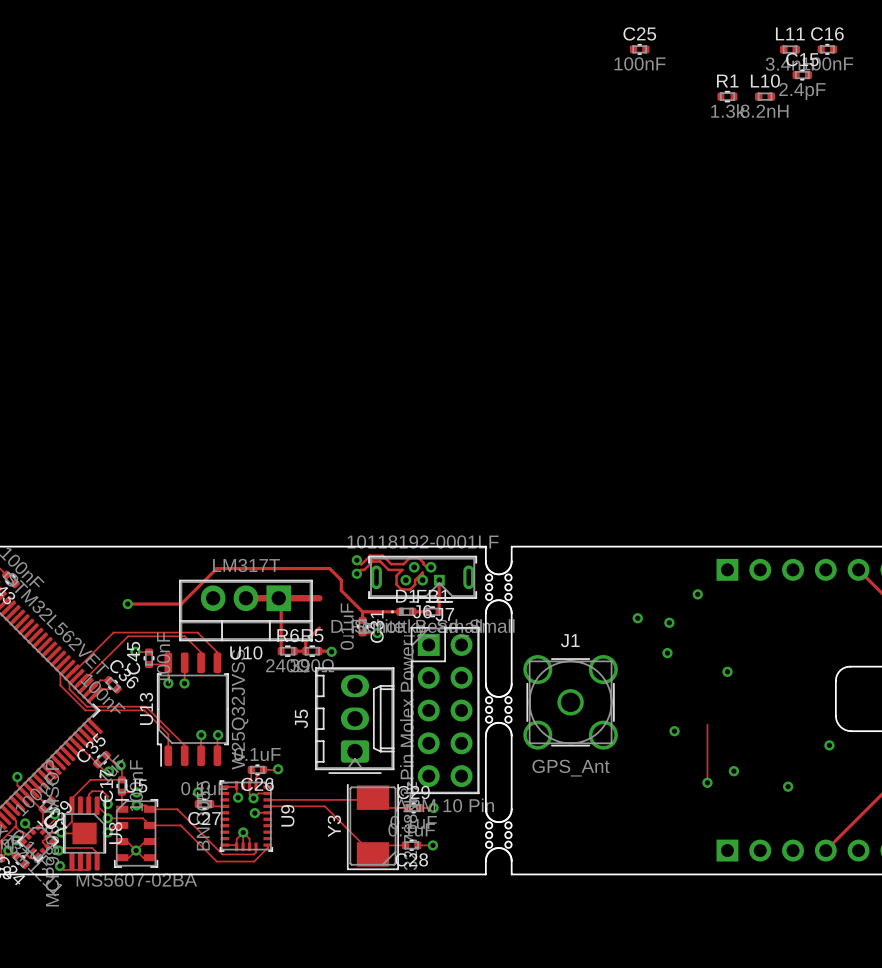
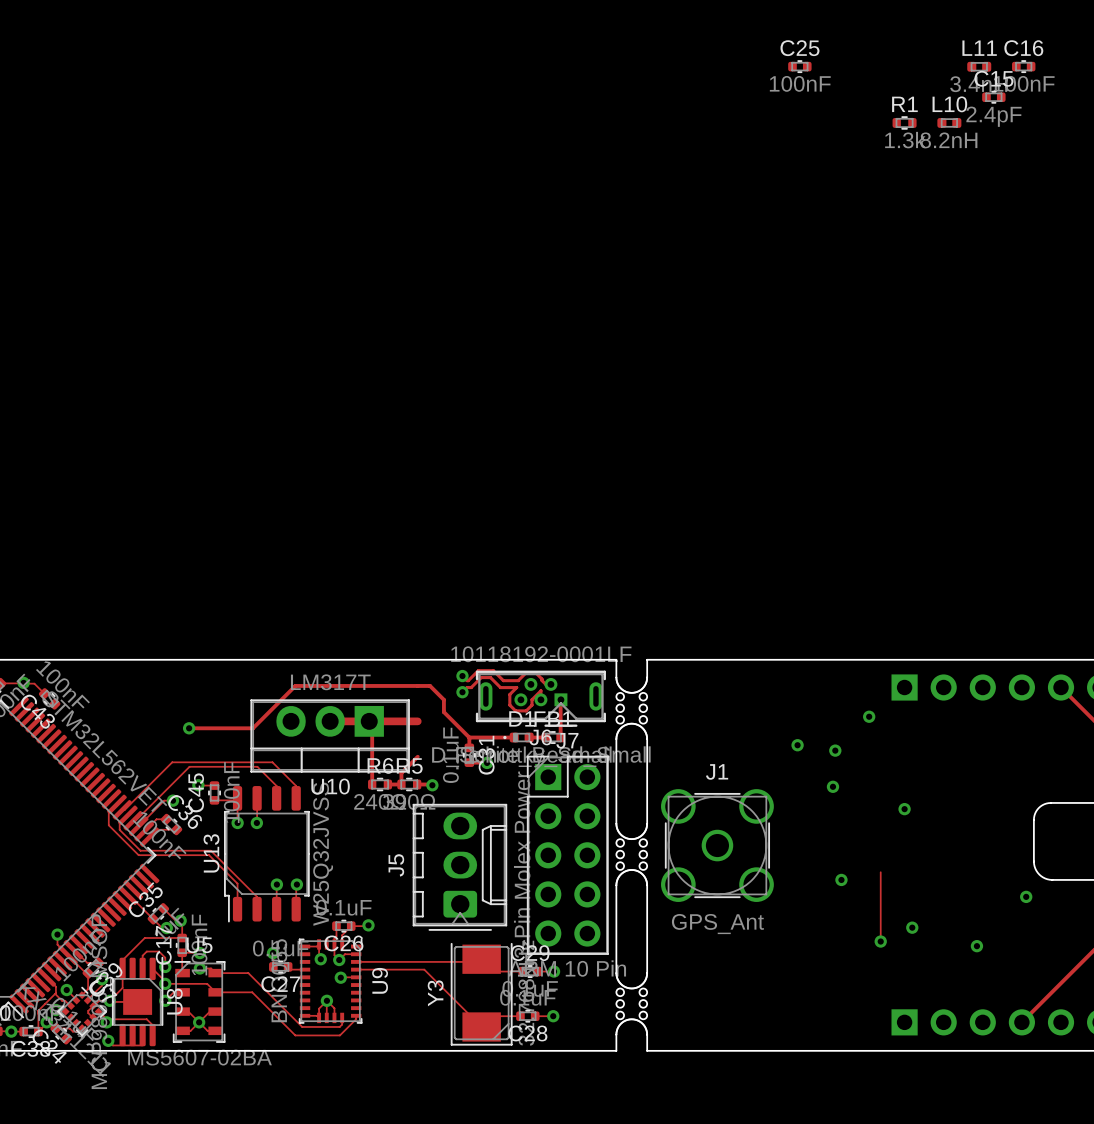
track: none -> (172, 800) (164, 800) (138, 826)
via: none -> (172, 800)

